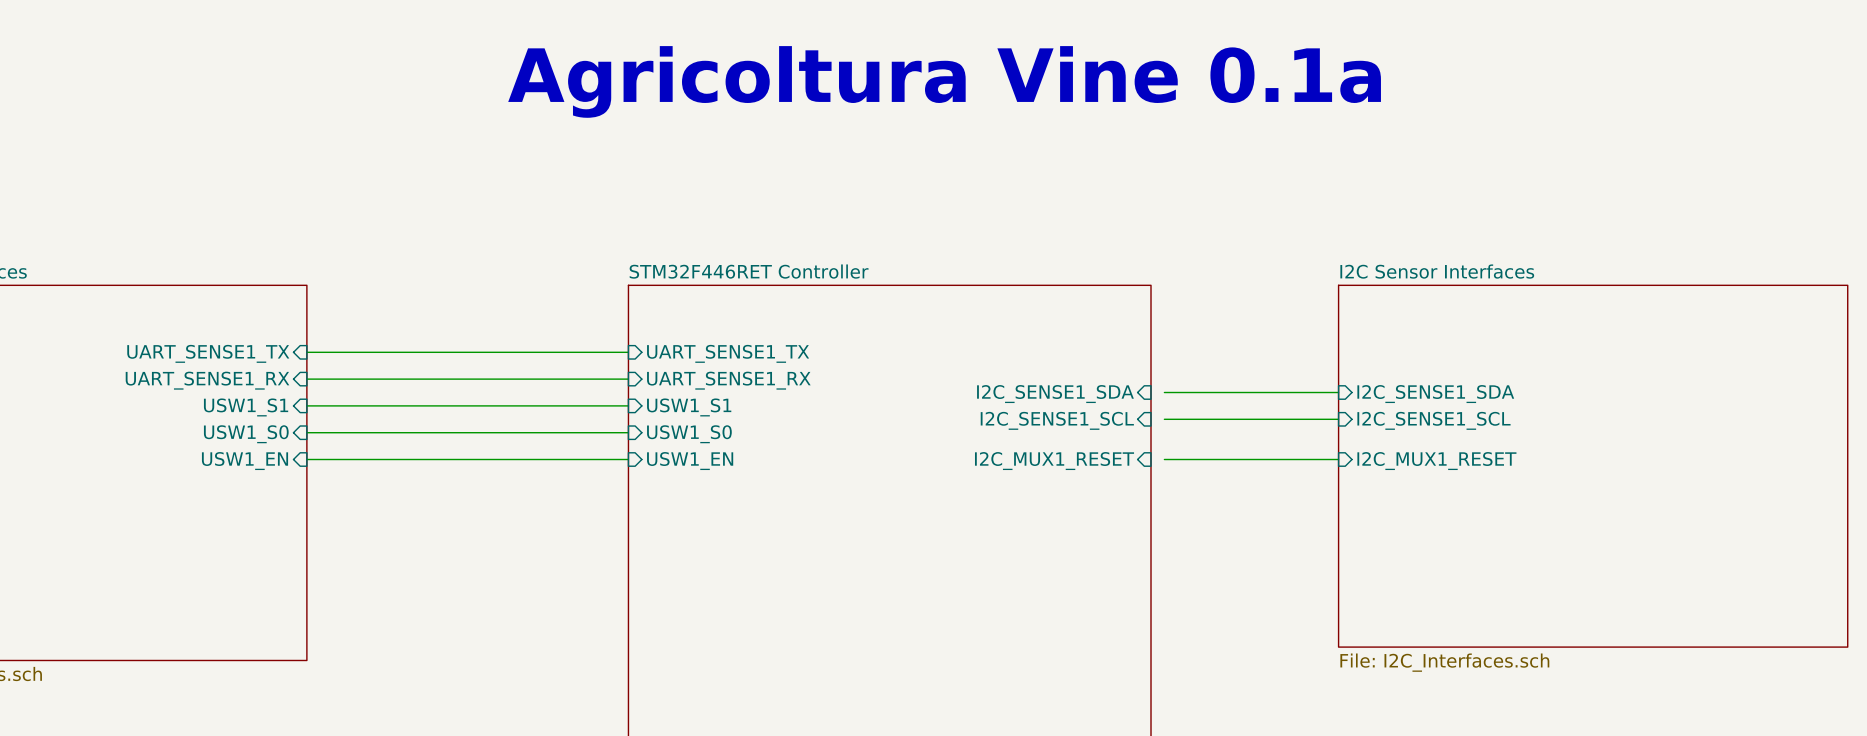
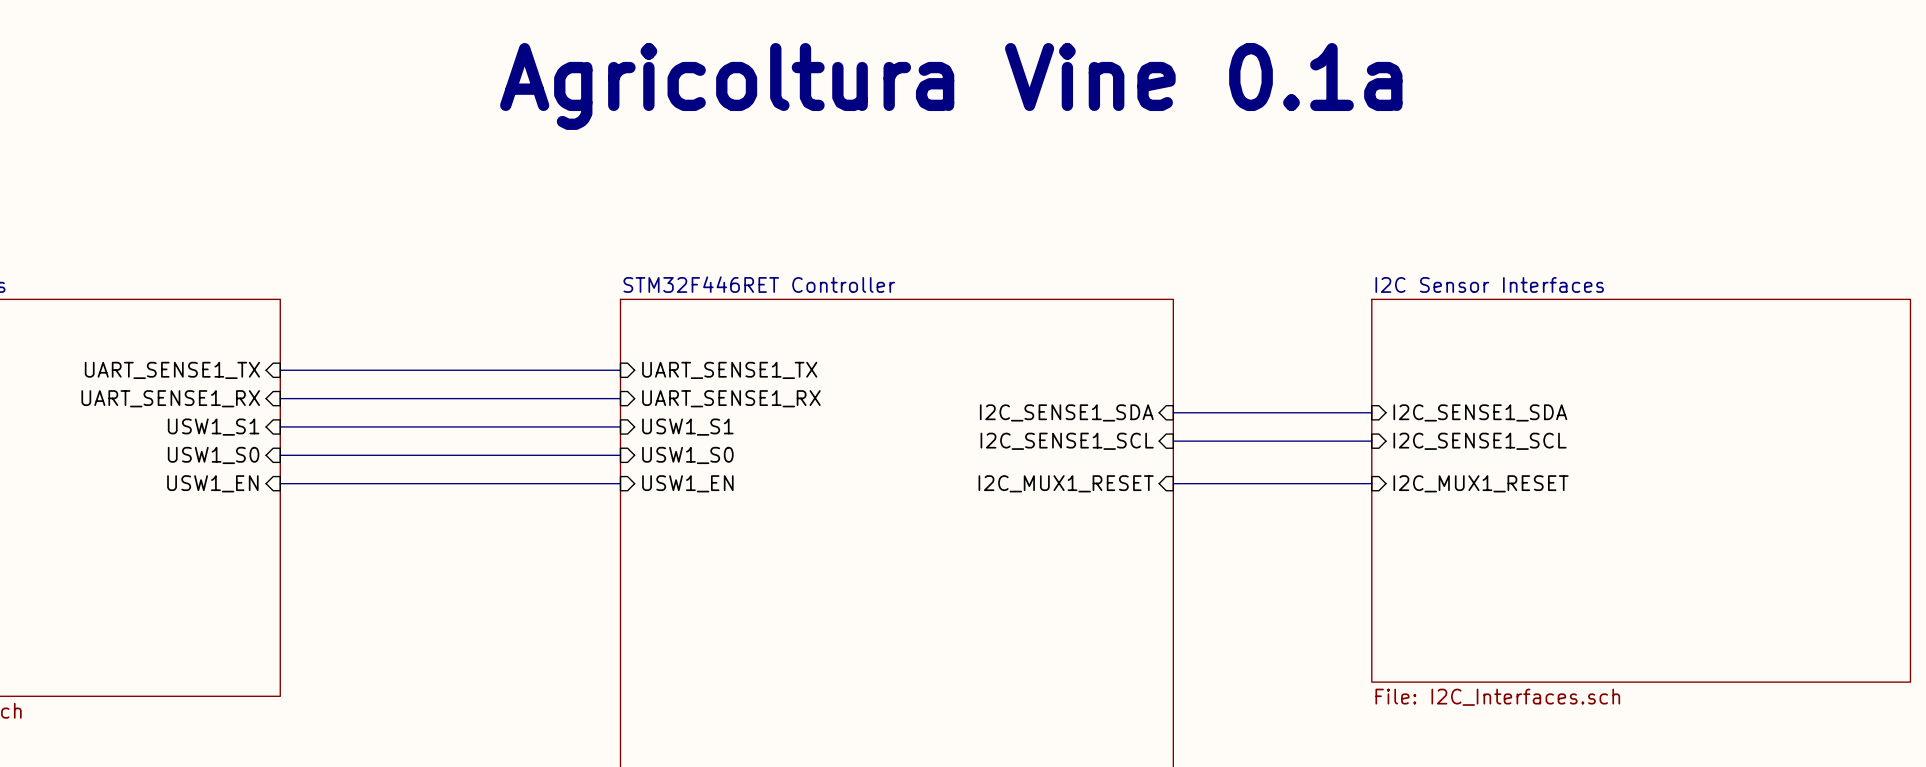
wire: none -> (1173, 412) (1187, 412)
wire: none -> (1173, 441) (1187, 441)
wire: none -> (1173, 483) (1187, 483)

